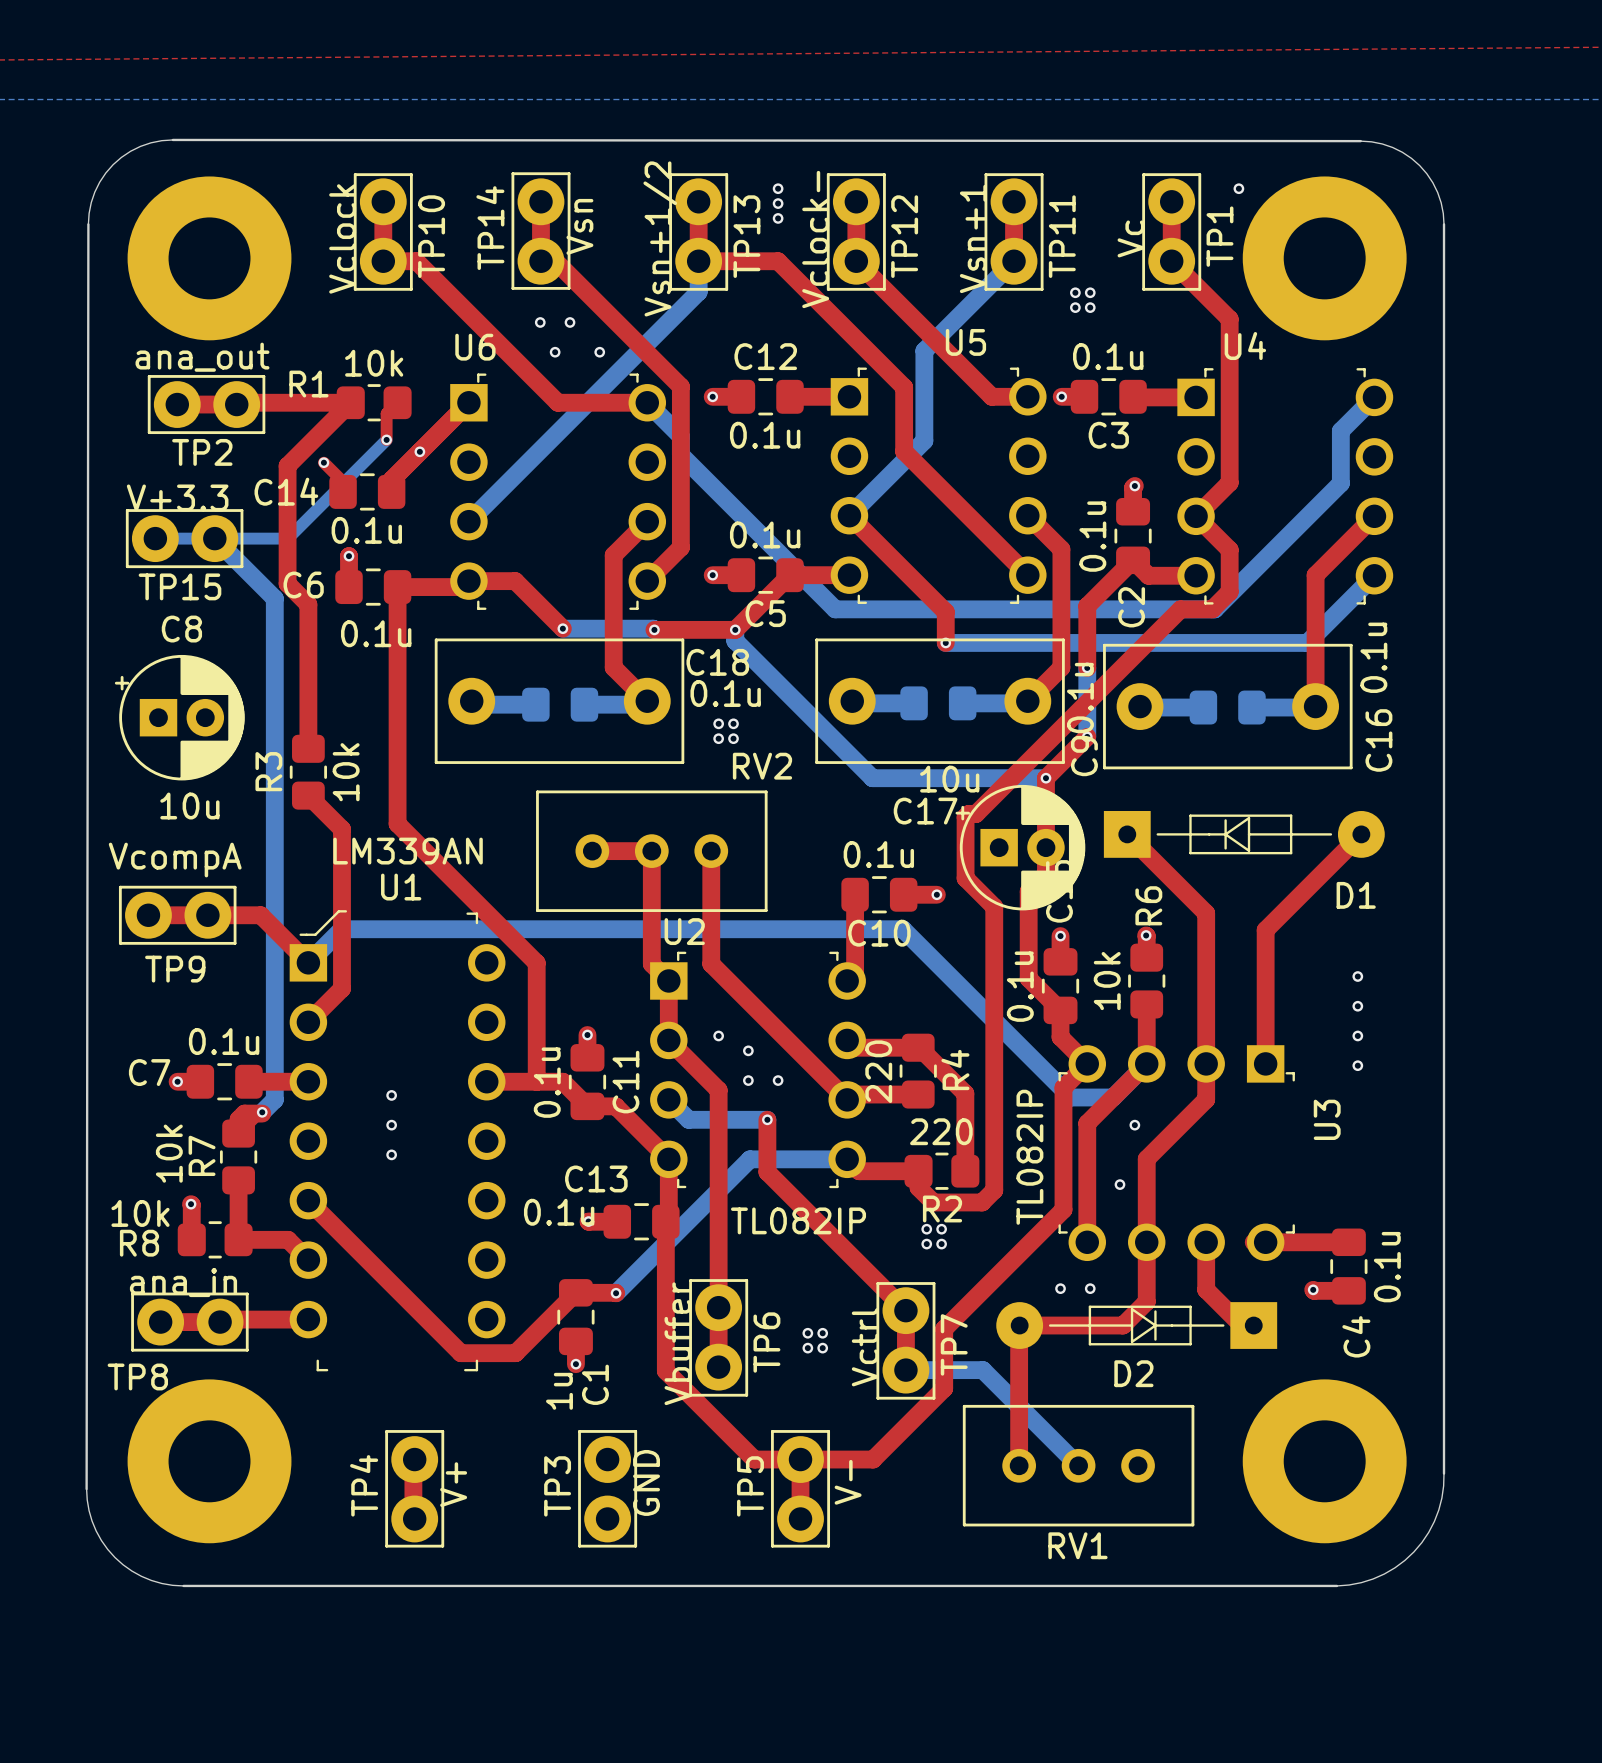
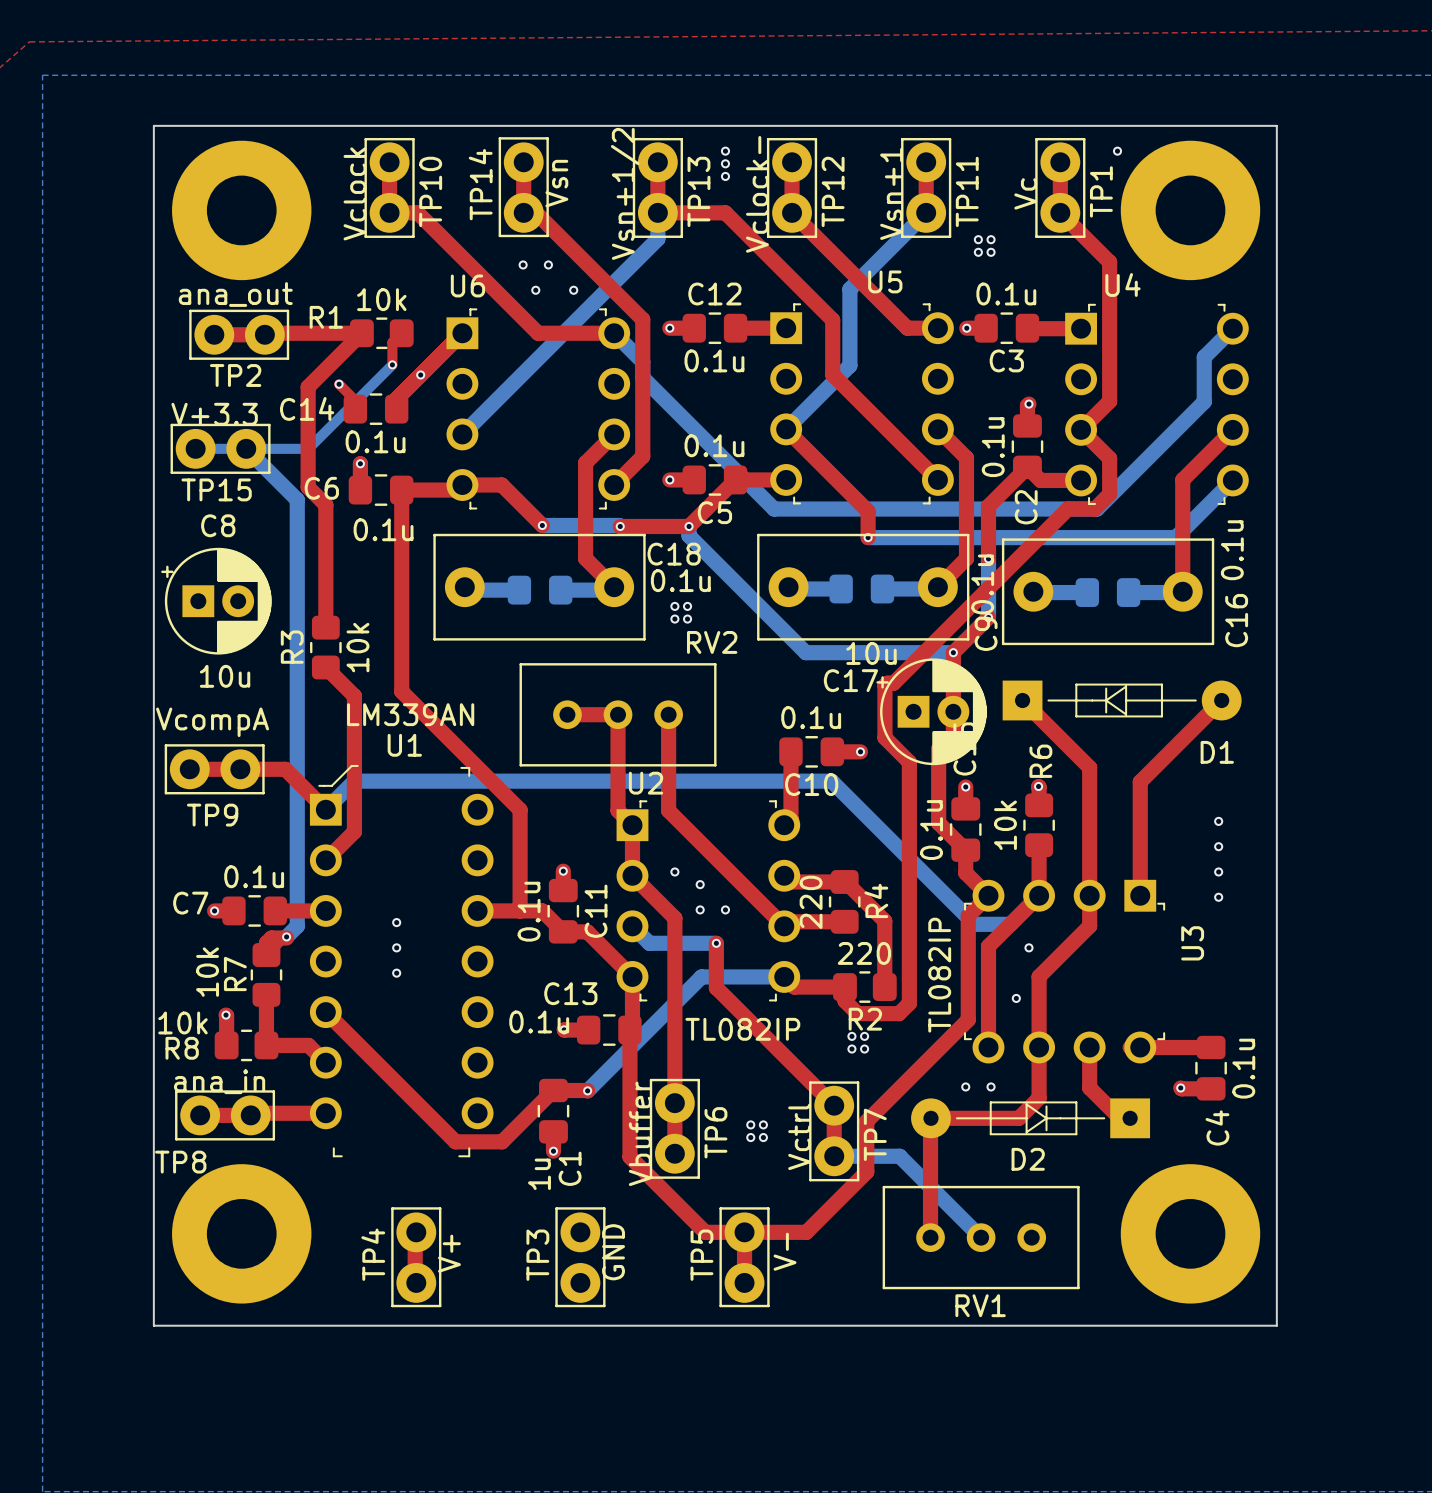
board edge: (172, 139) (1360, 141) (1382, 143) (1402, 152) (1426, 173) (1437, 192) (1444, 224) (1444, 1473) (1441, 1498) (1434, 1521) (1421, 1542) (1404, 1560) (1373, 1578) (1337, 1585) (183, 1585) (161, 1583) (141, 1576) (123, 1564) (107, 1549) (92, 1521) (86, 1489) (88, 224) (94, 192) (113, 164) (140, 146) (172, 139) -> (153, 125) (153, 1325) (1276, 1325) (1276, 125) (153, 125)

